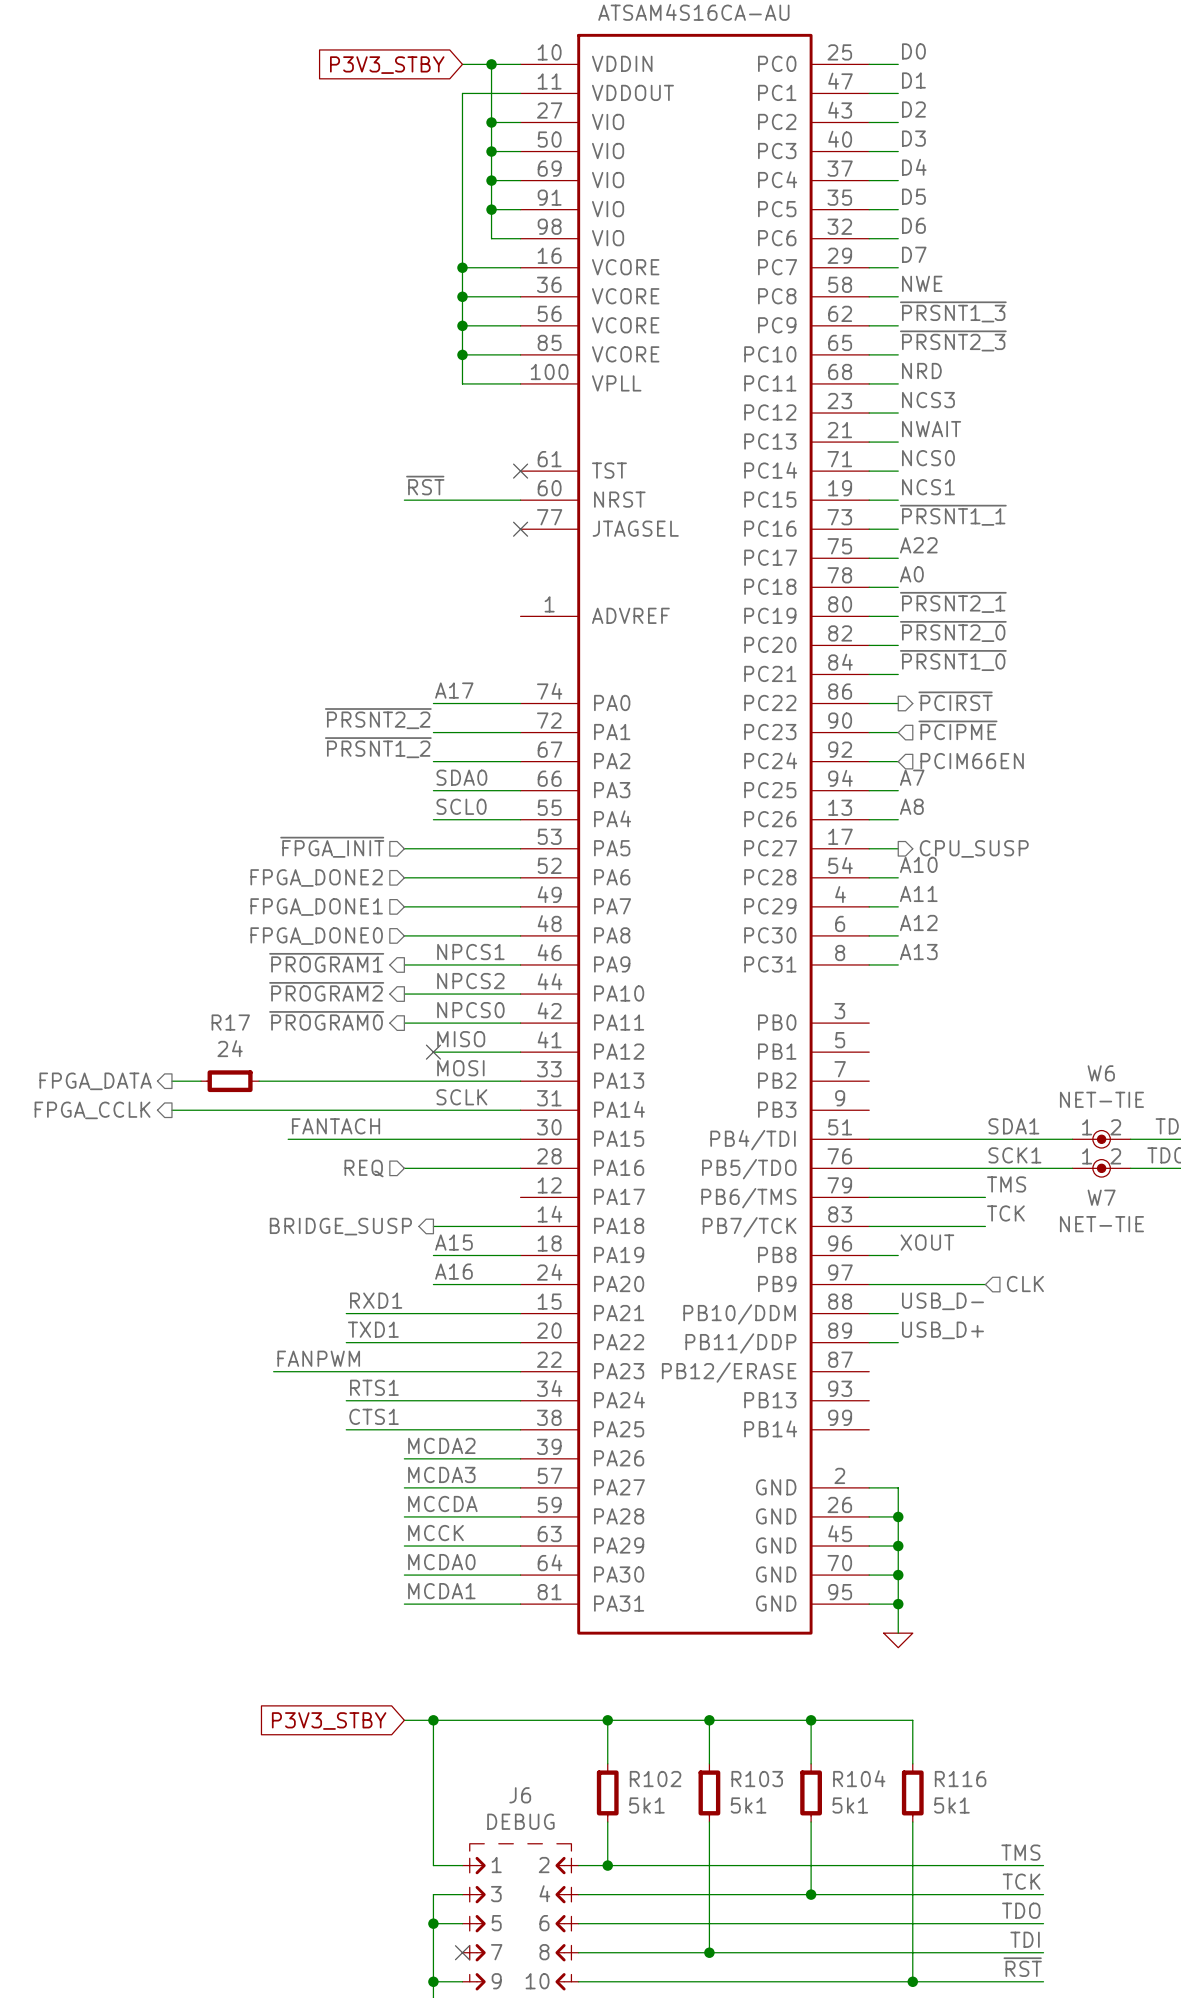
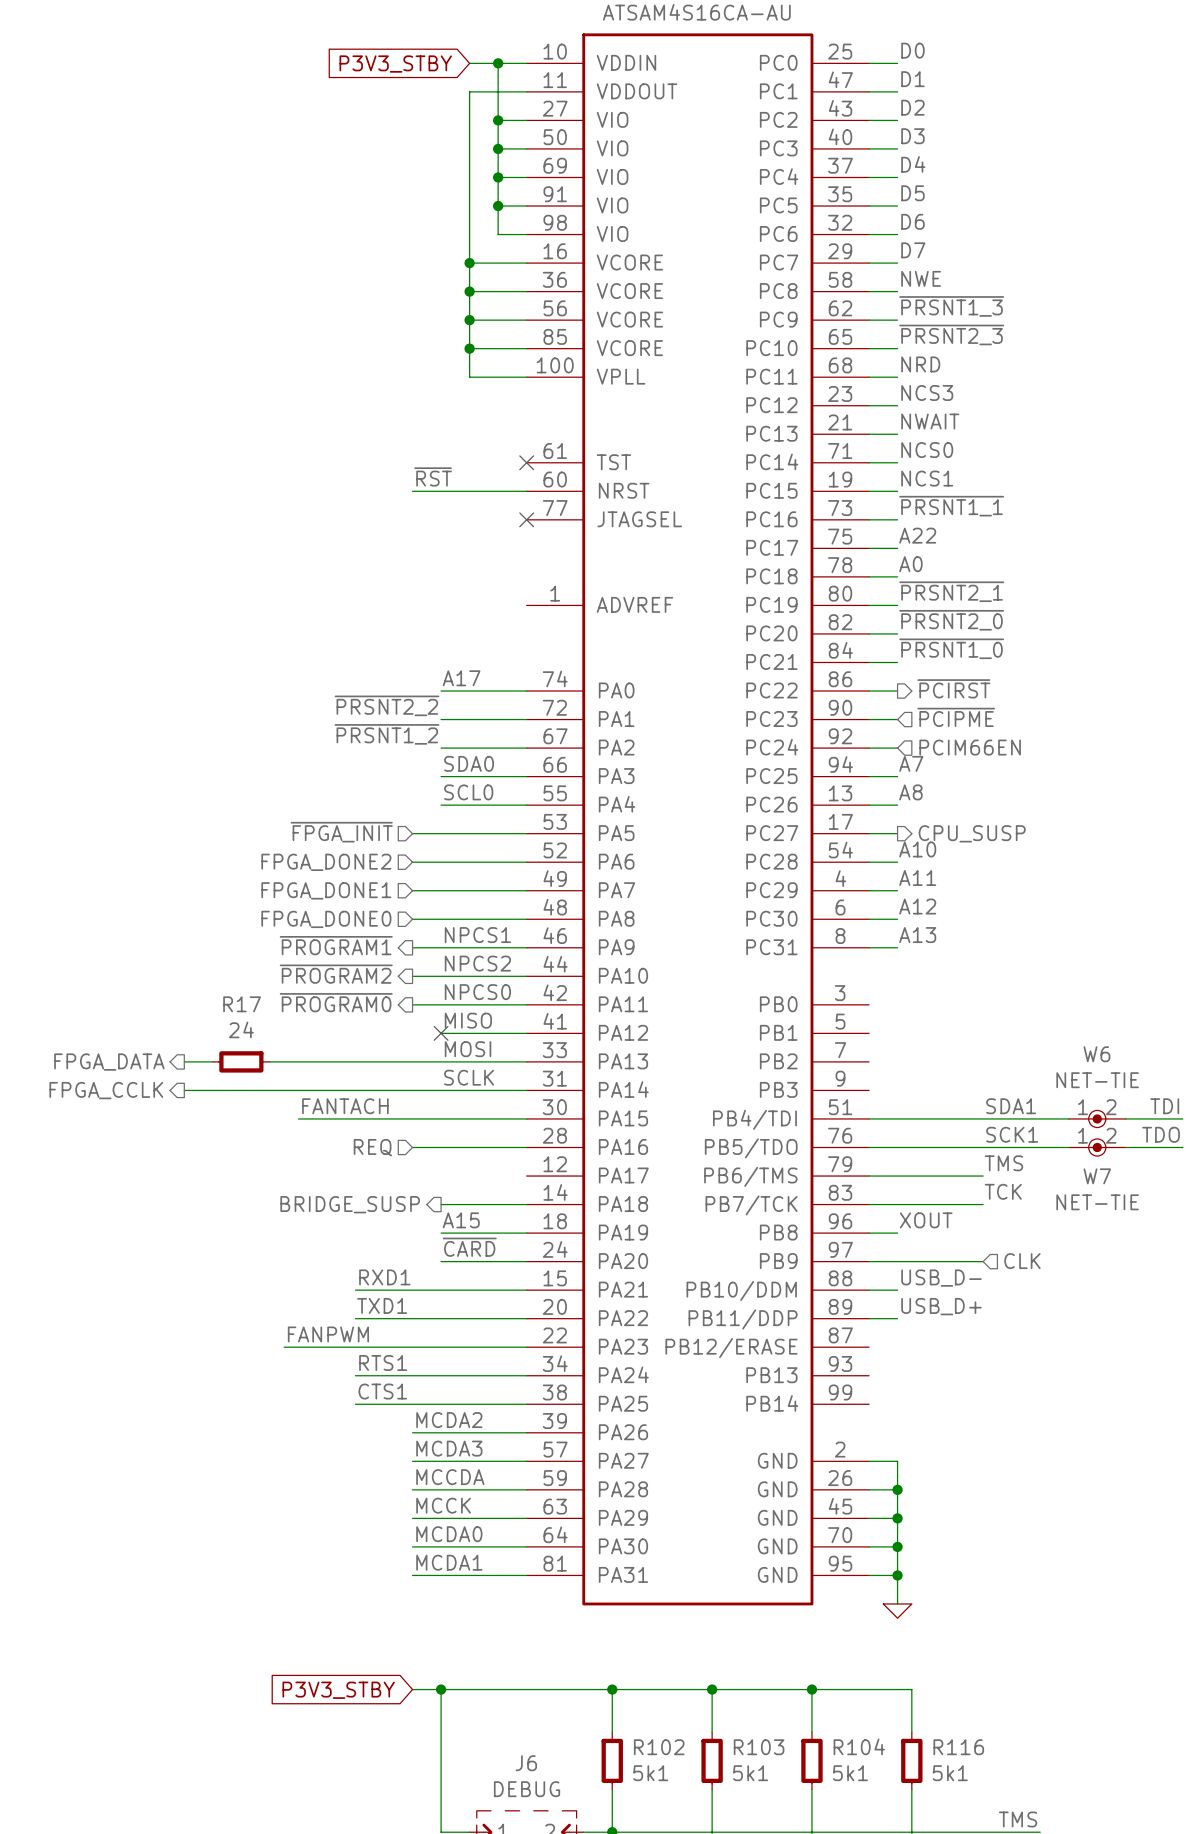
label: A16 (453, 1271) -> ~{CARD} (469, 1247)

